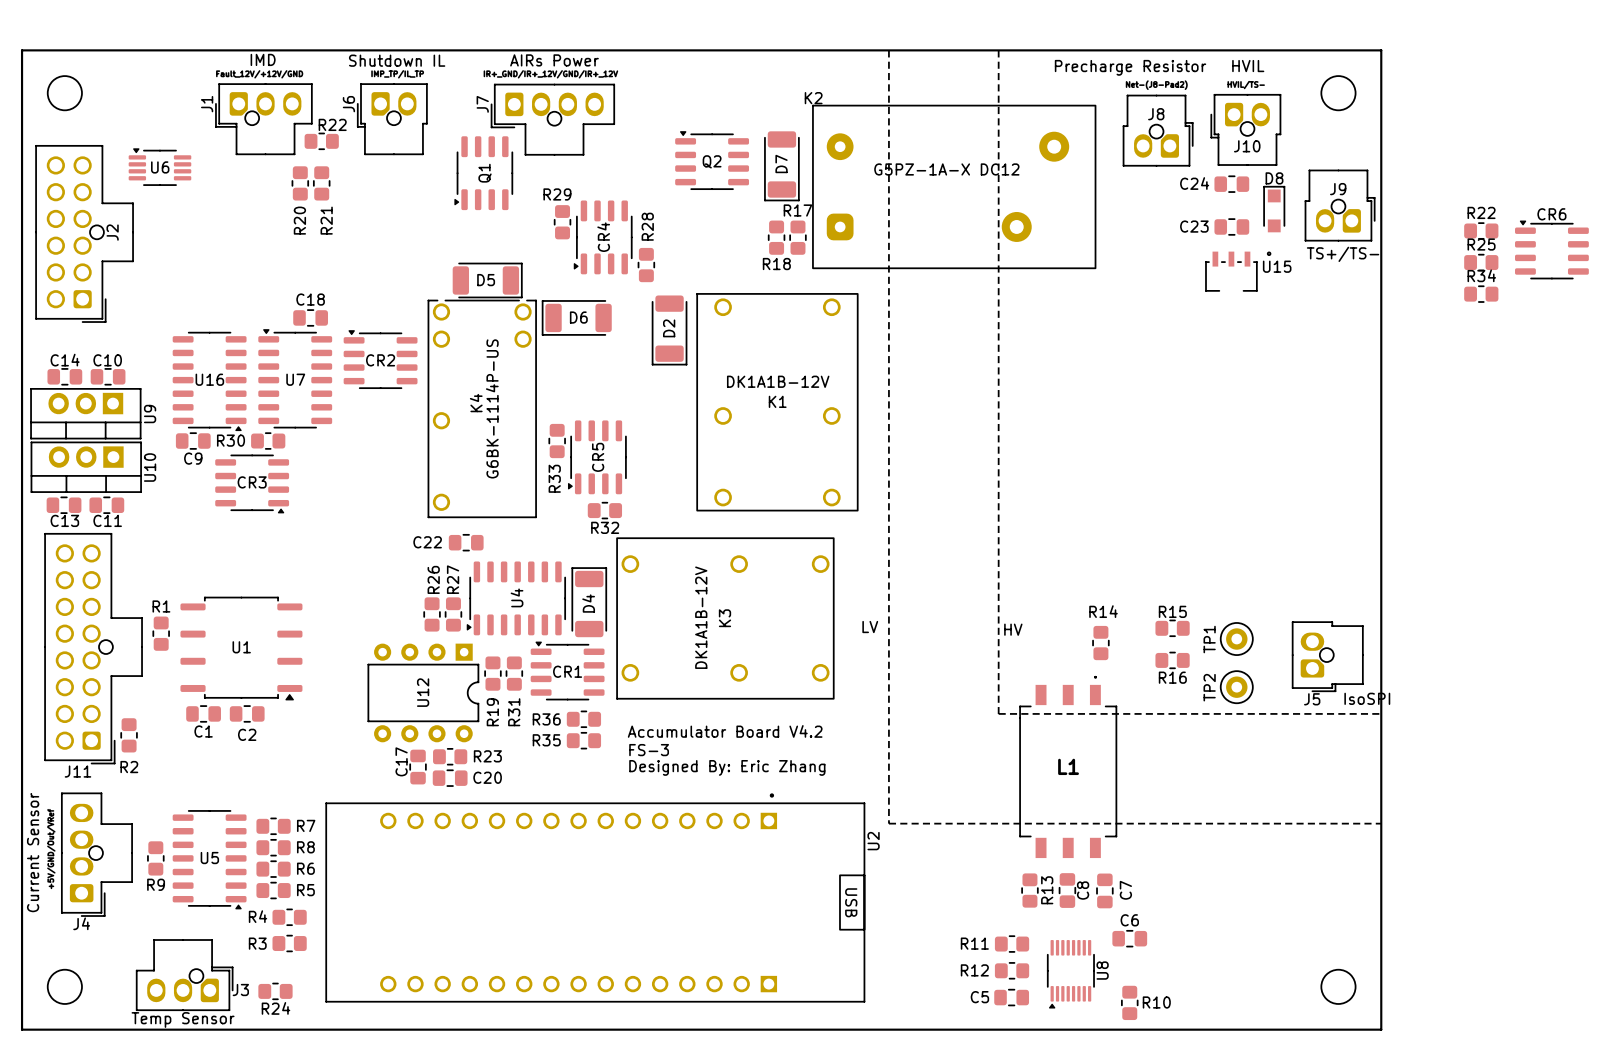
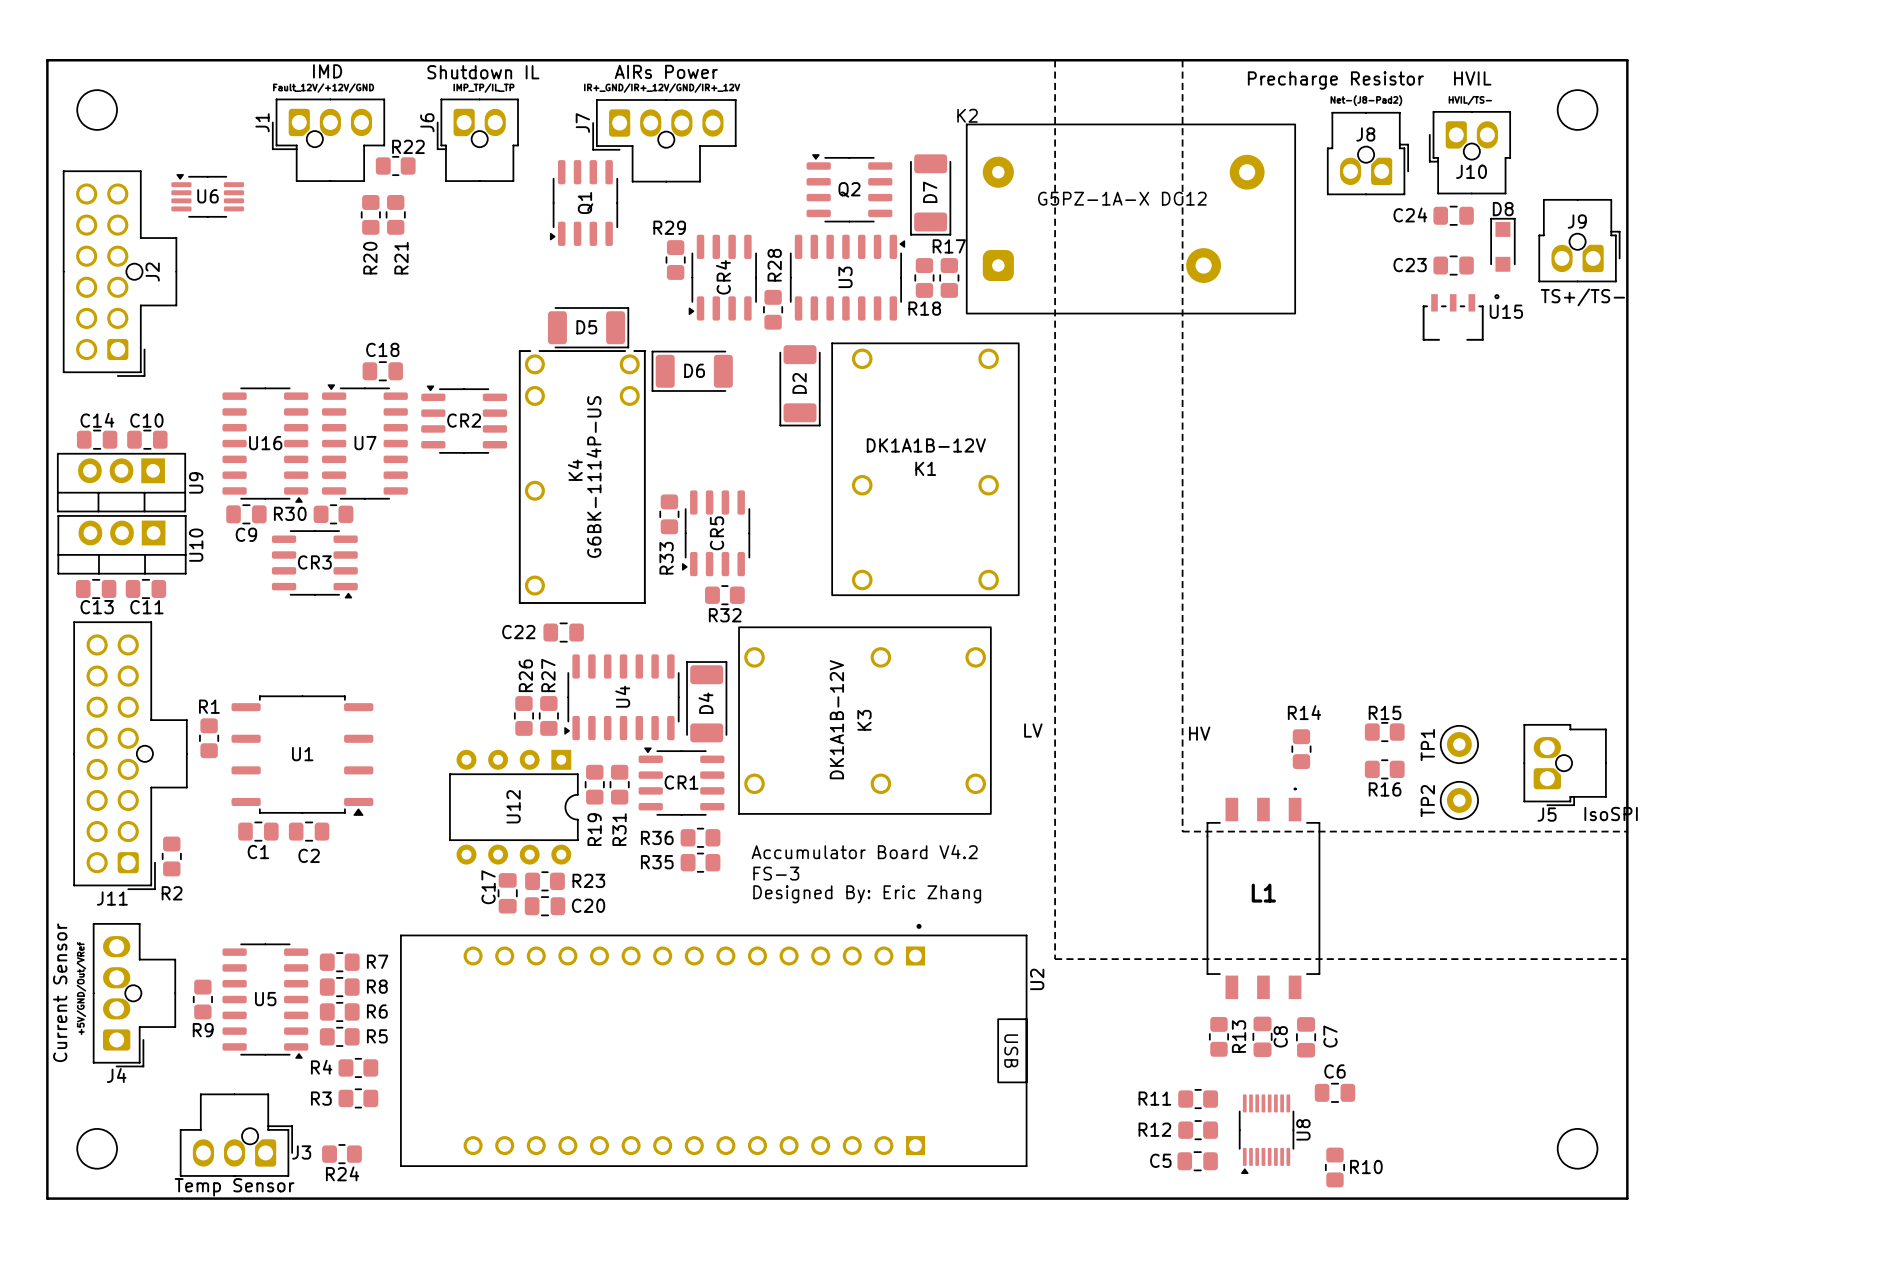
R22: (1481, 230) -> none
U3: none -> (847, 277)
CR6: (1551, 249) -> none
R25: (1481, 262) -> none
R34: (1481, 294) -> none

